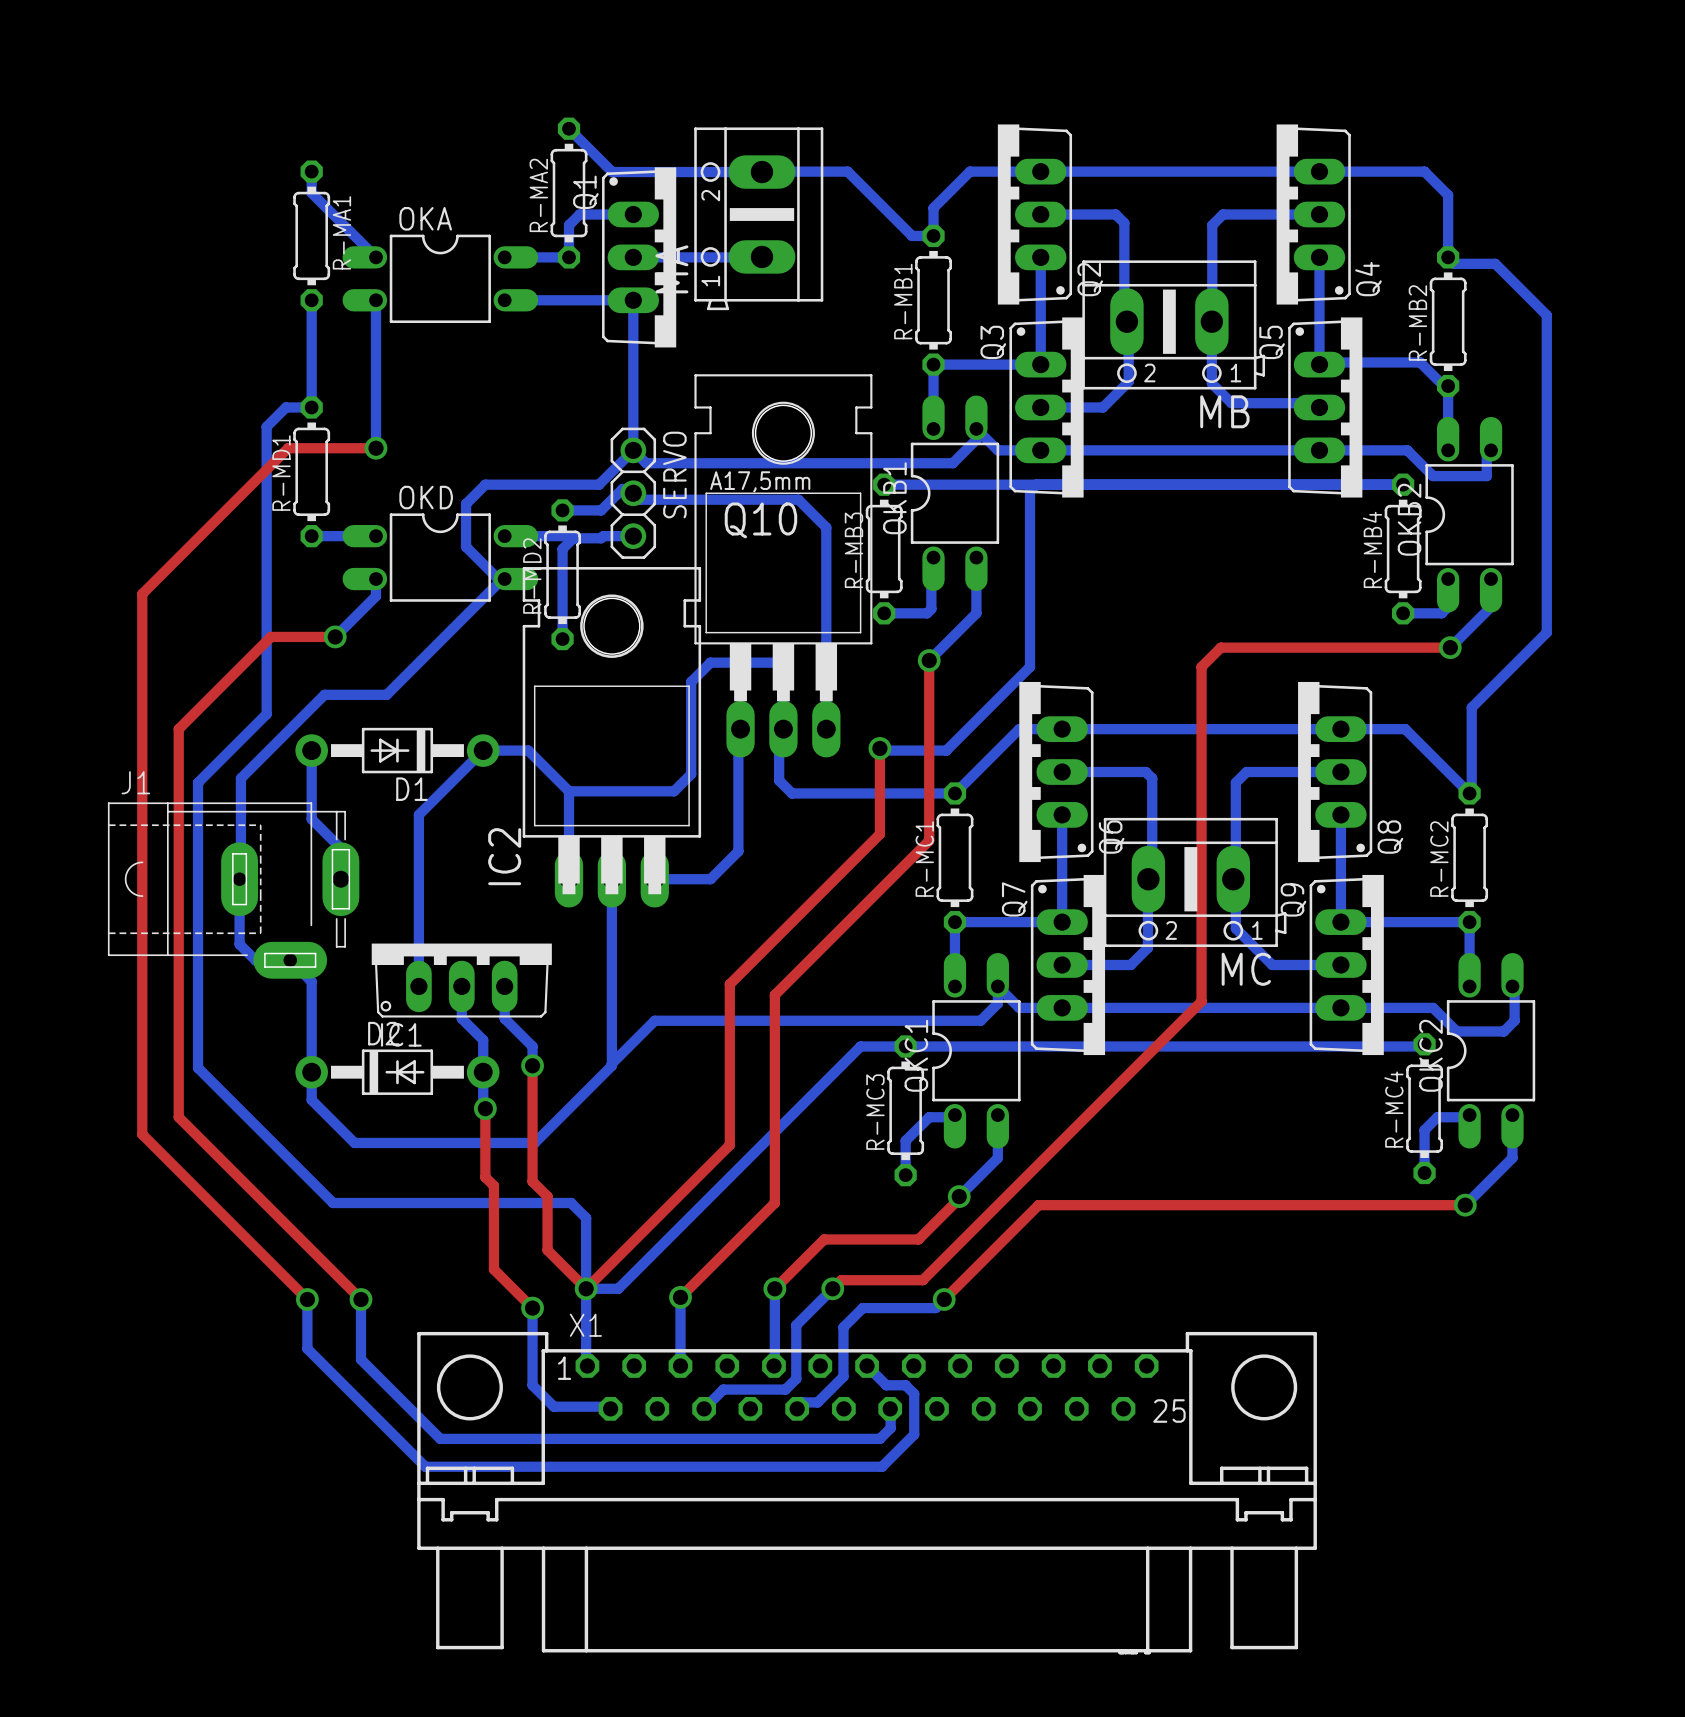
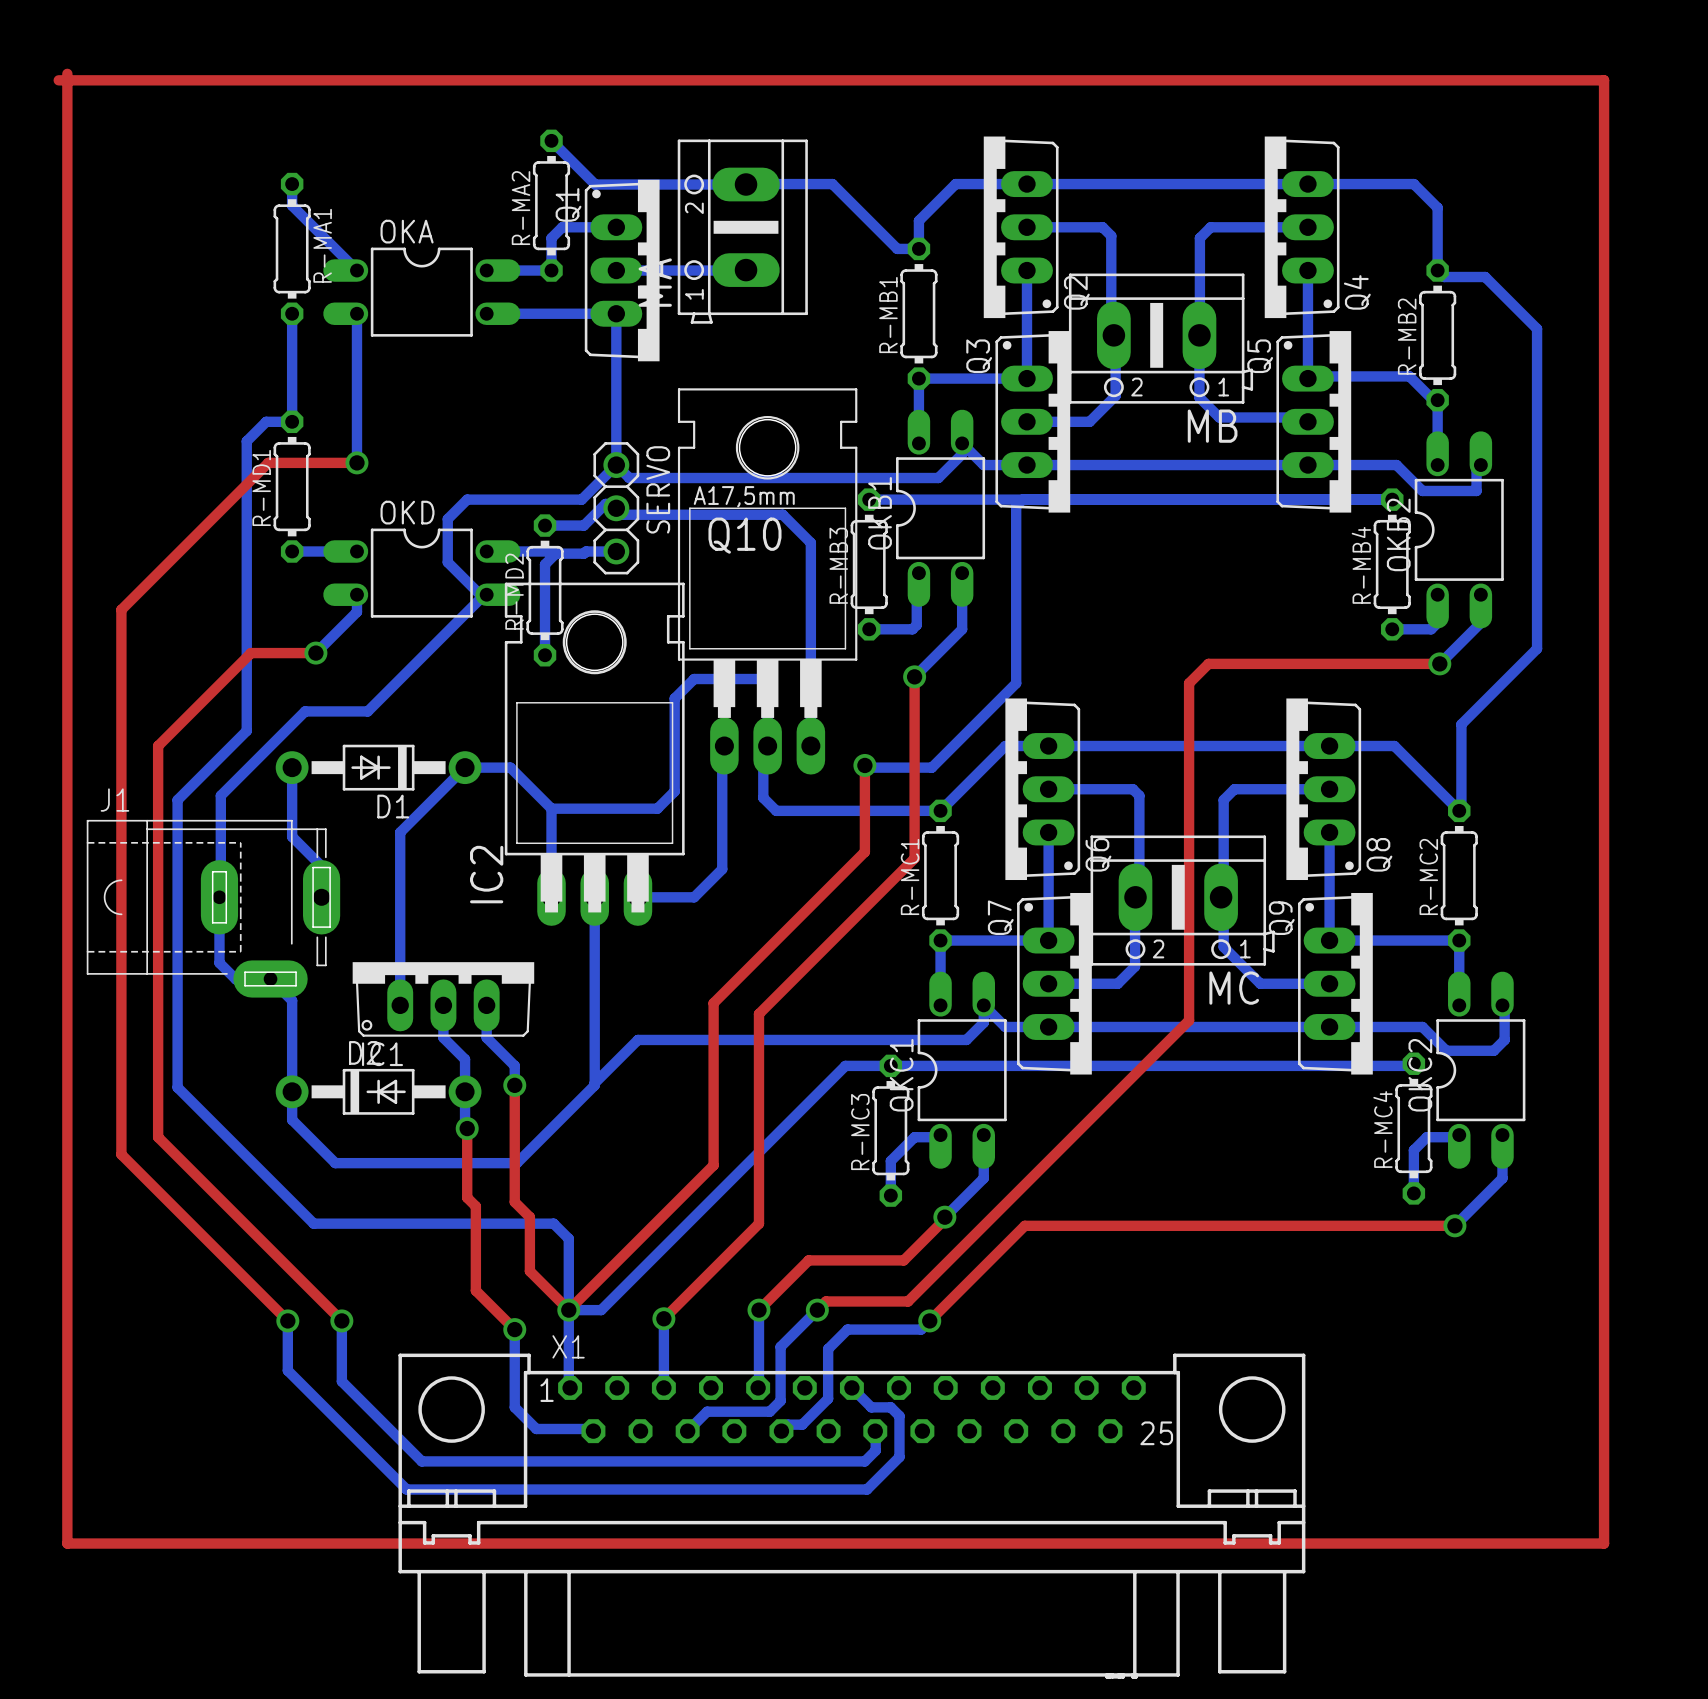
top track: none -> (67, 73) (67, 1543) (1604, 1543) (1604, 80) (58, 80)

